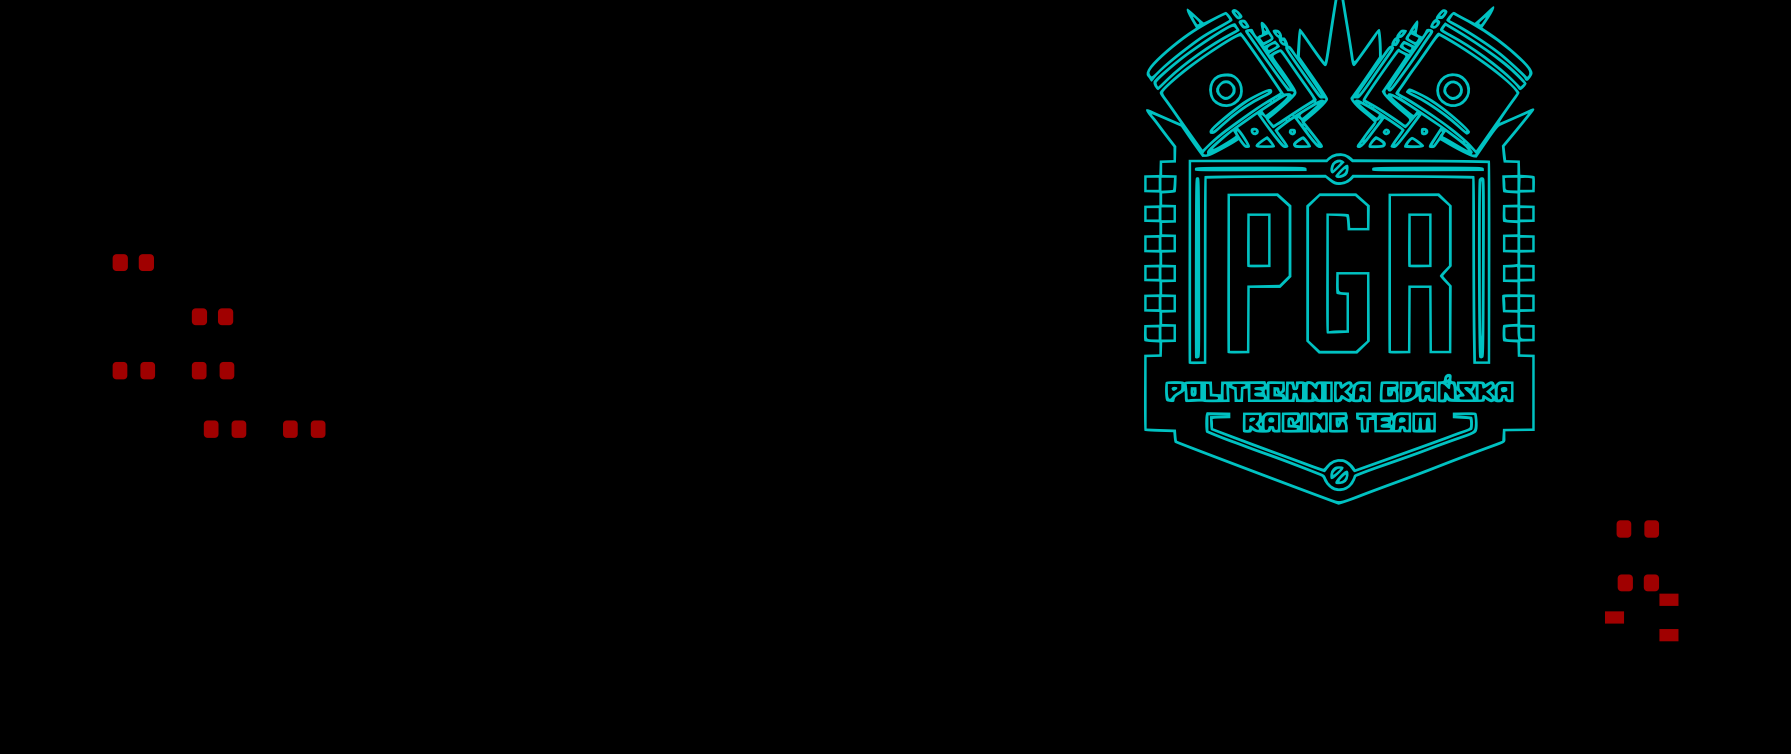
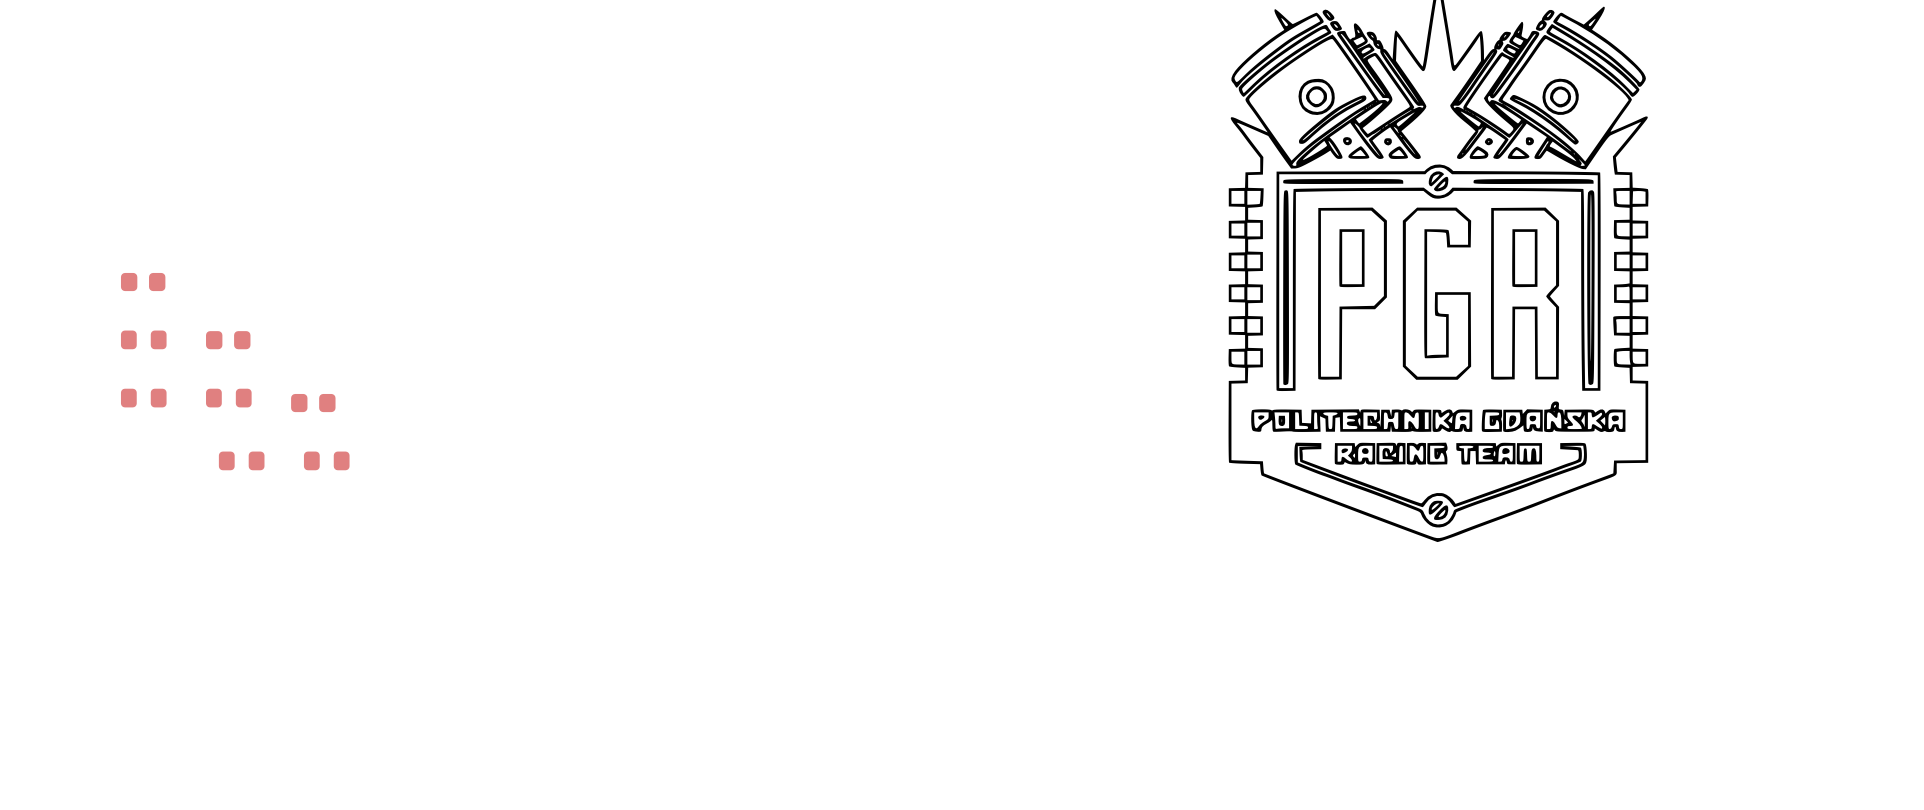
part: none -> (143, 339)
part: none -> (313, 403)
part: (1637, 528) -> none
part: (1638, 582) -> none
part: (1641, 617) -> none

